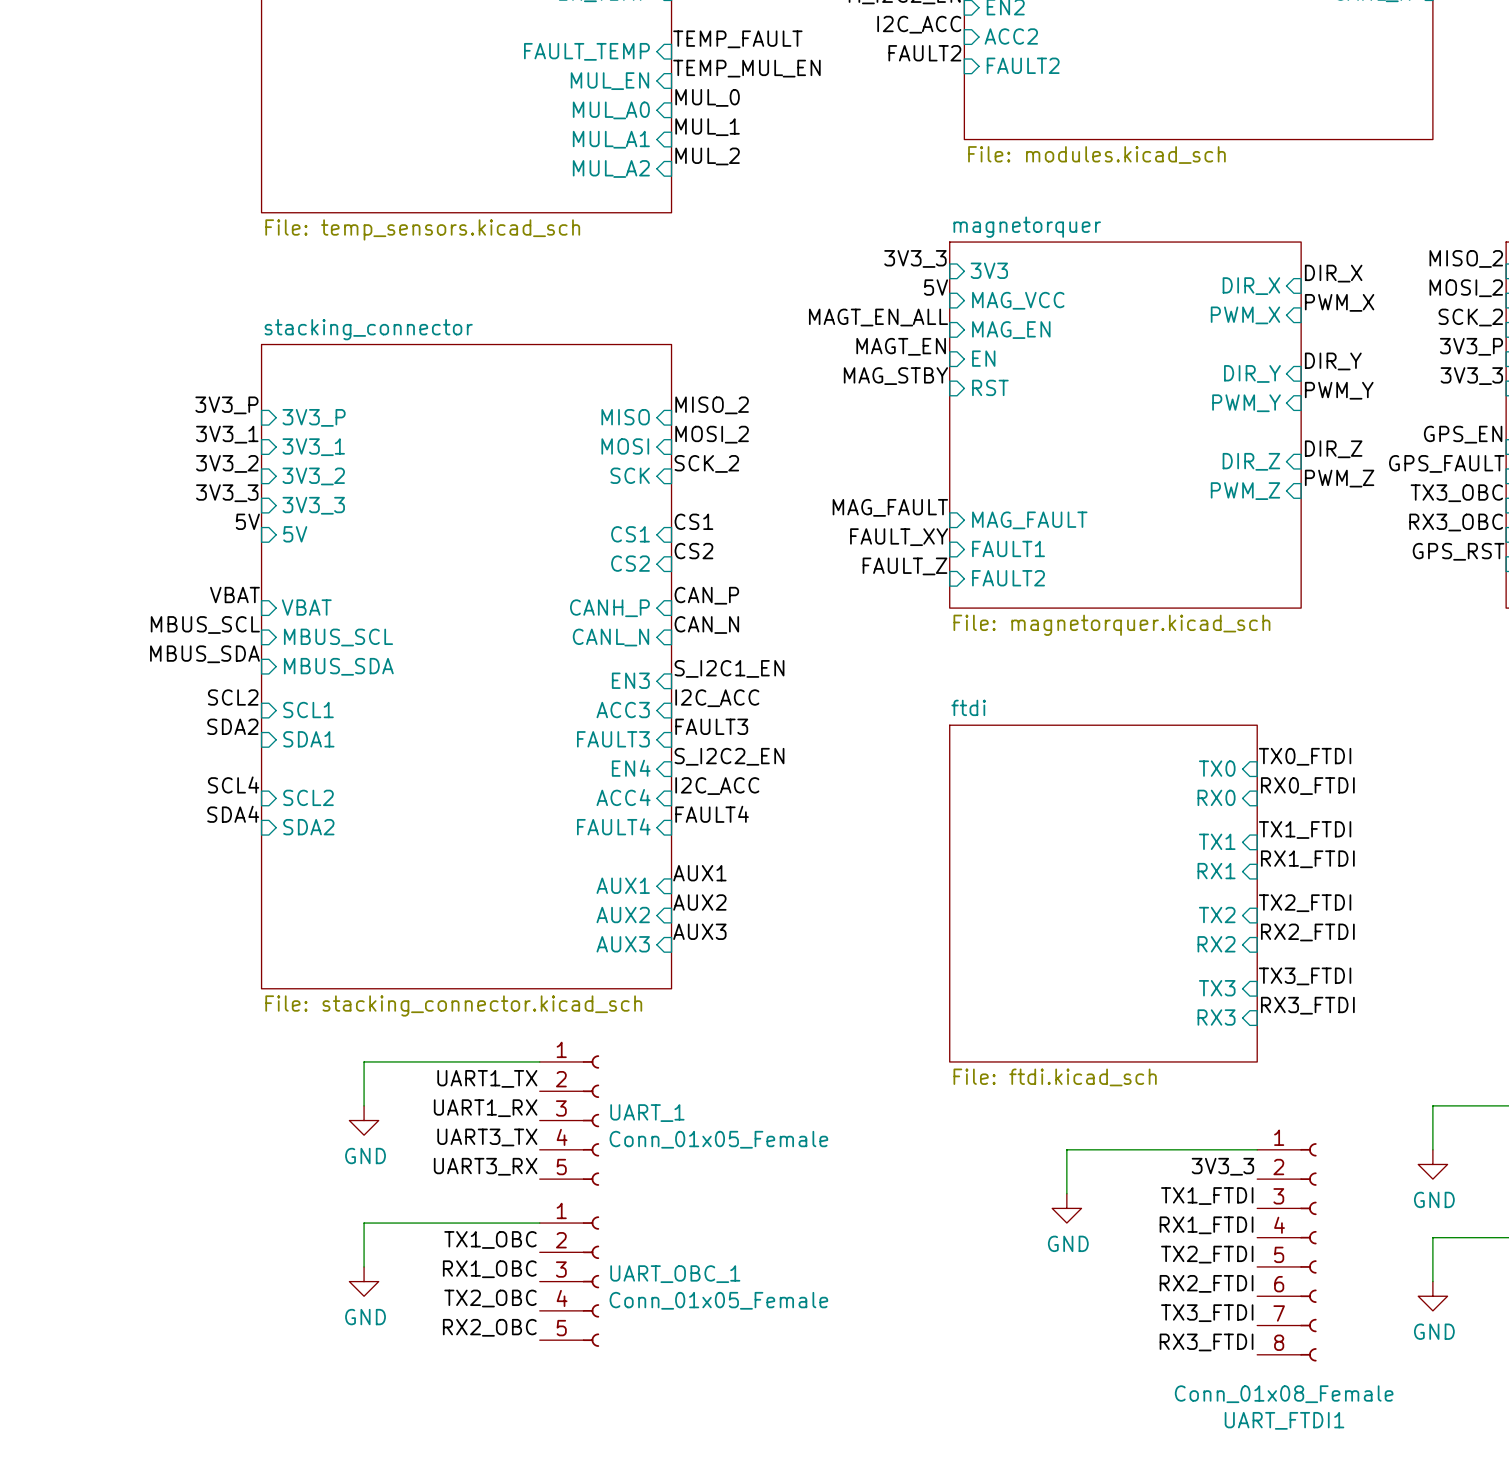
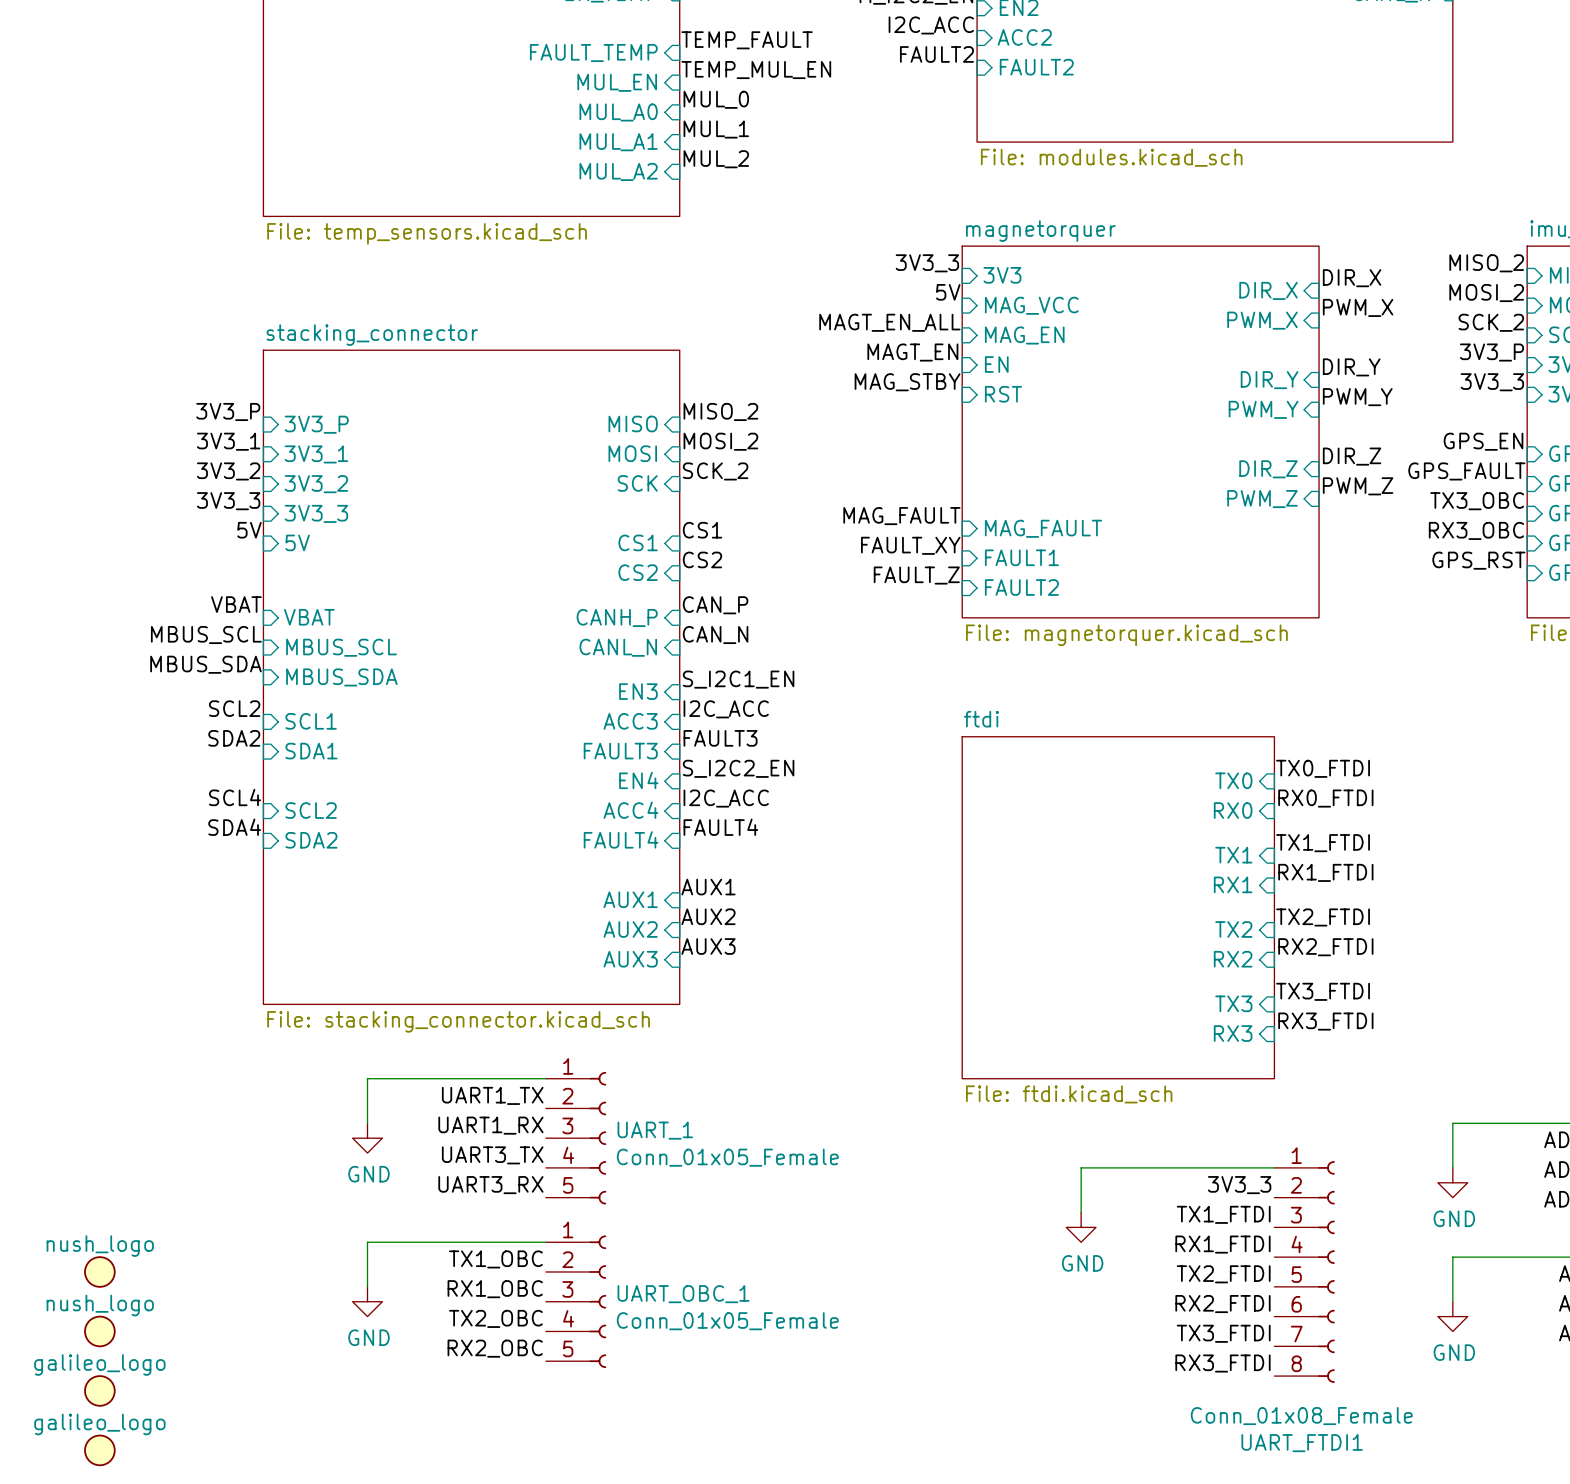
part: none -> nush_logo (99, 1271)
part: none -> nush_logo (99, 1331)
part: none -> galileo_logo (99, 1390)
part: none -> galileo_logo (99, 1450)

